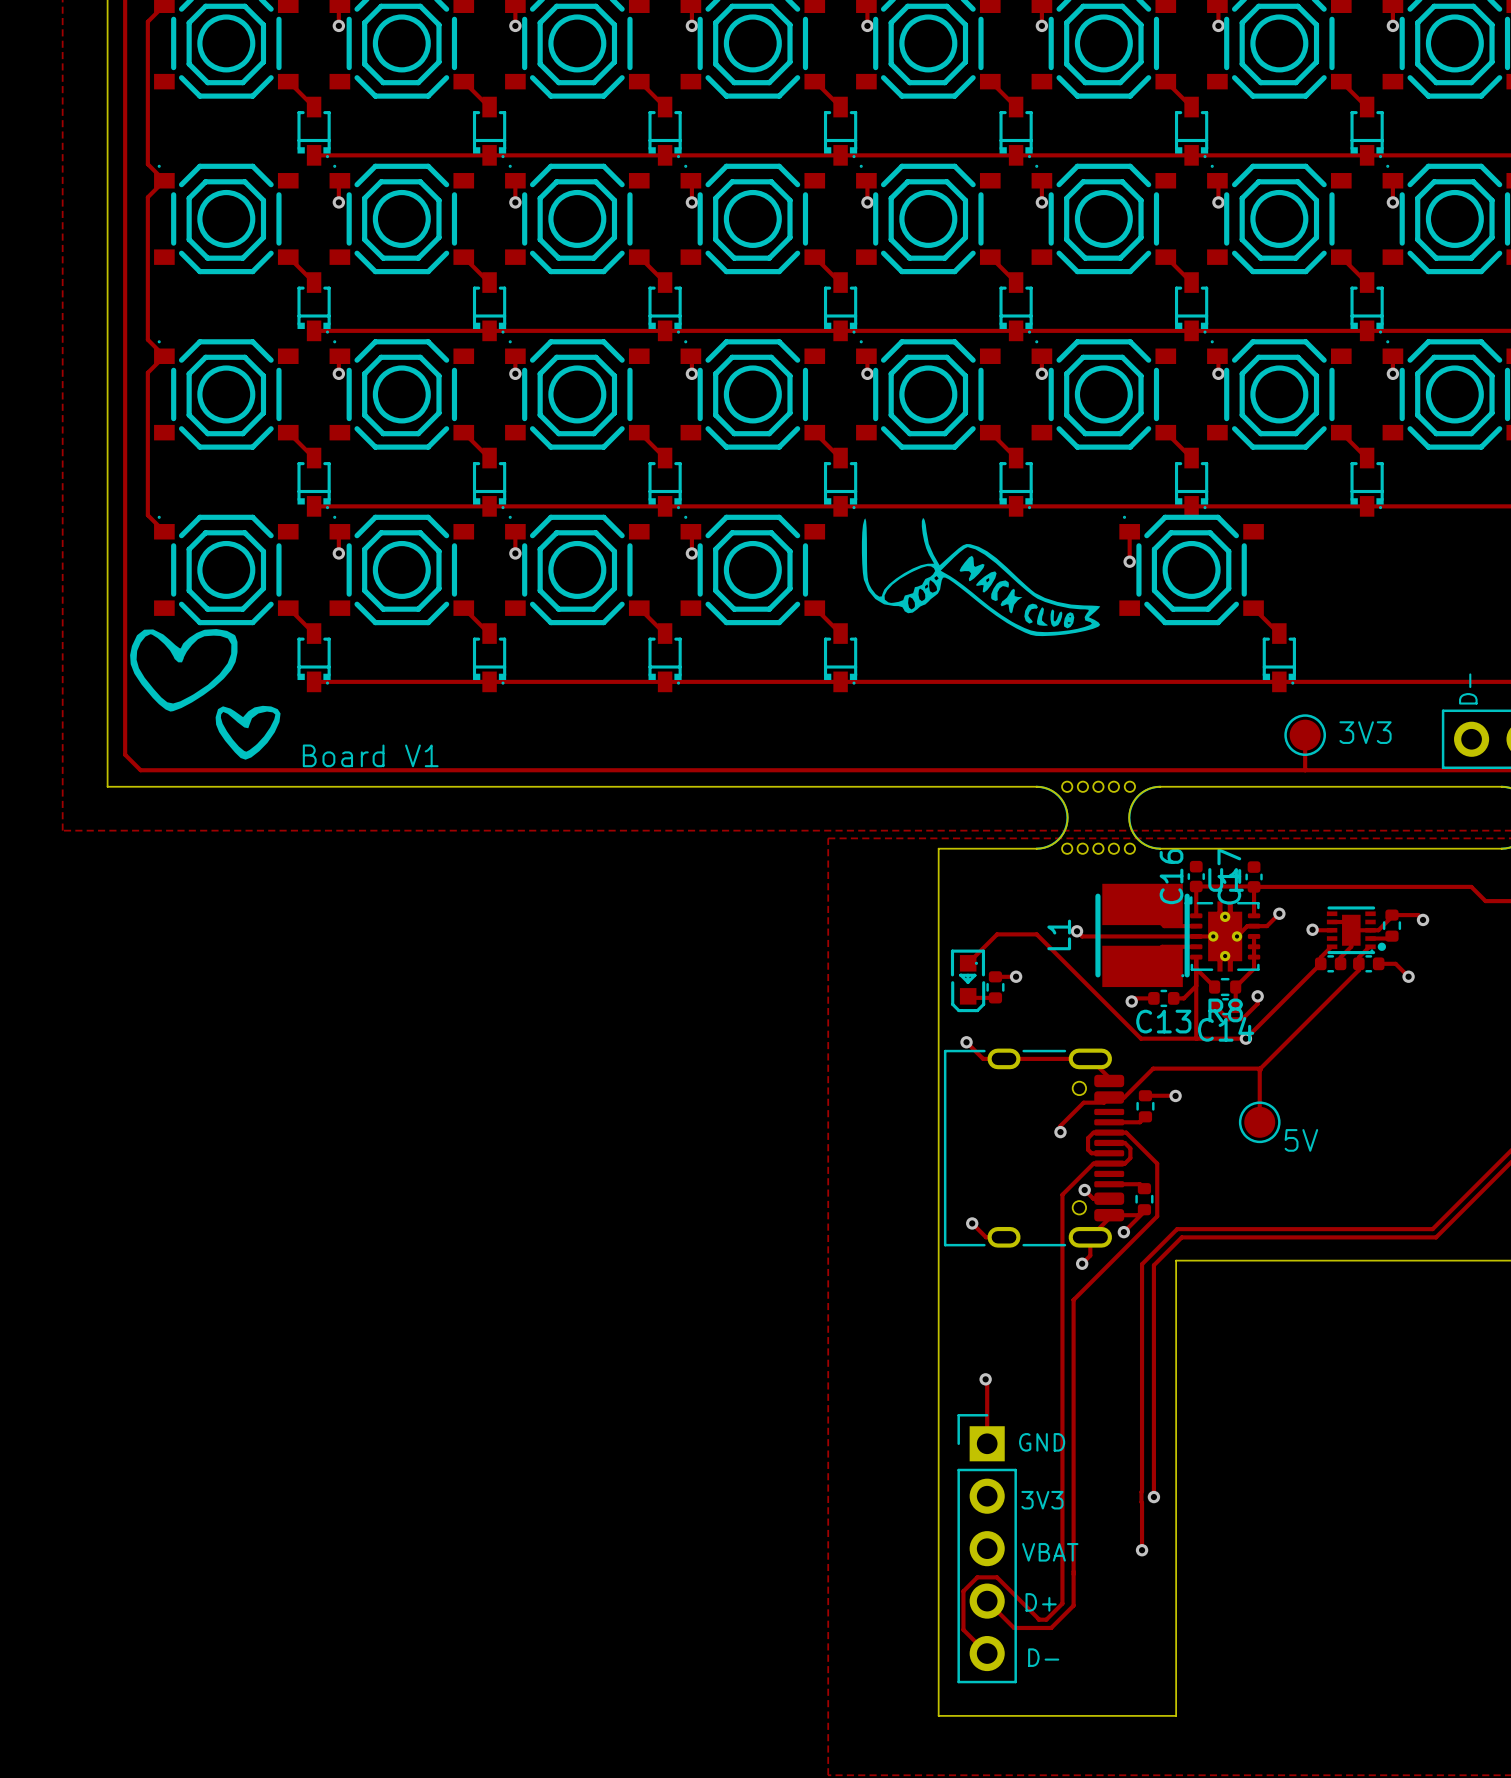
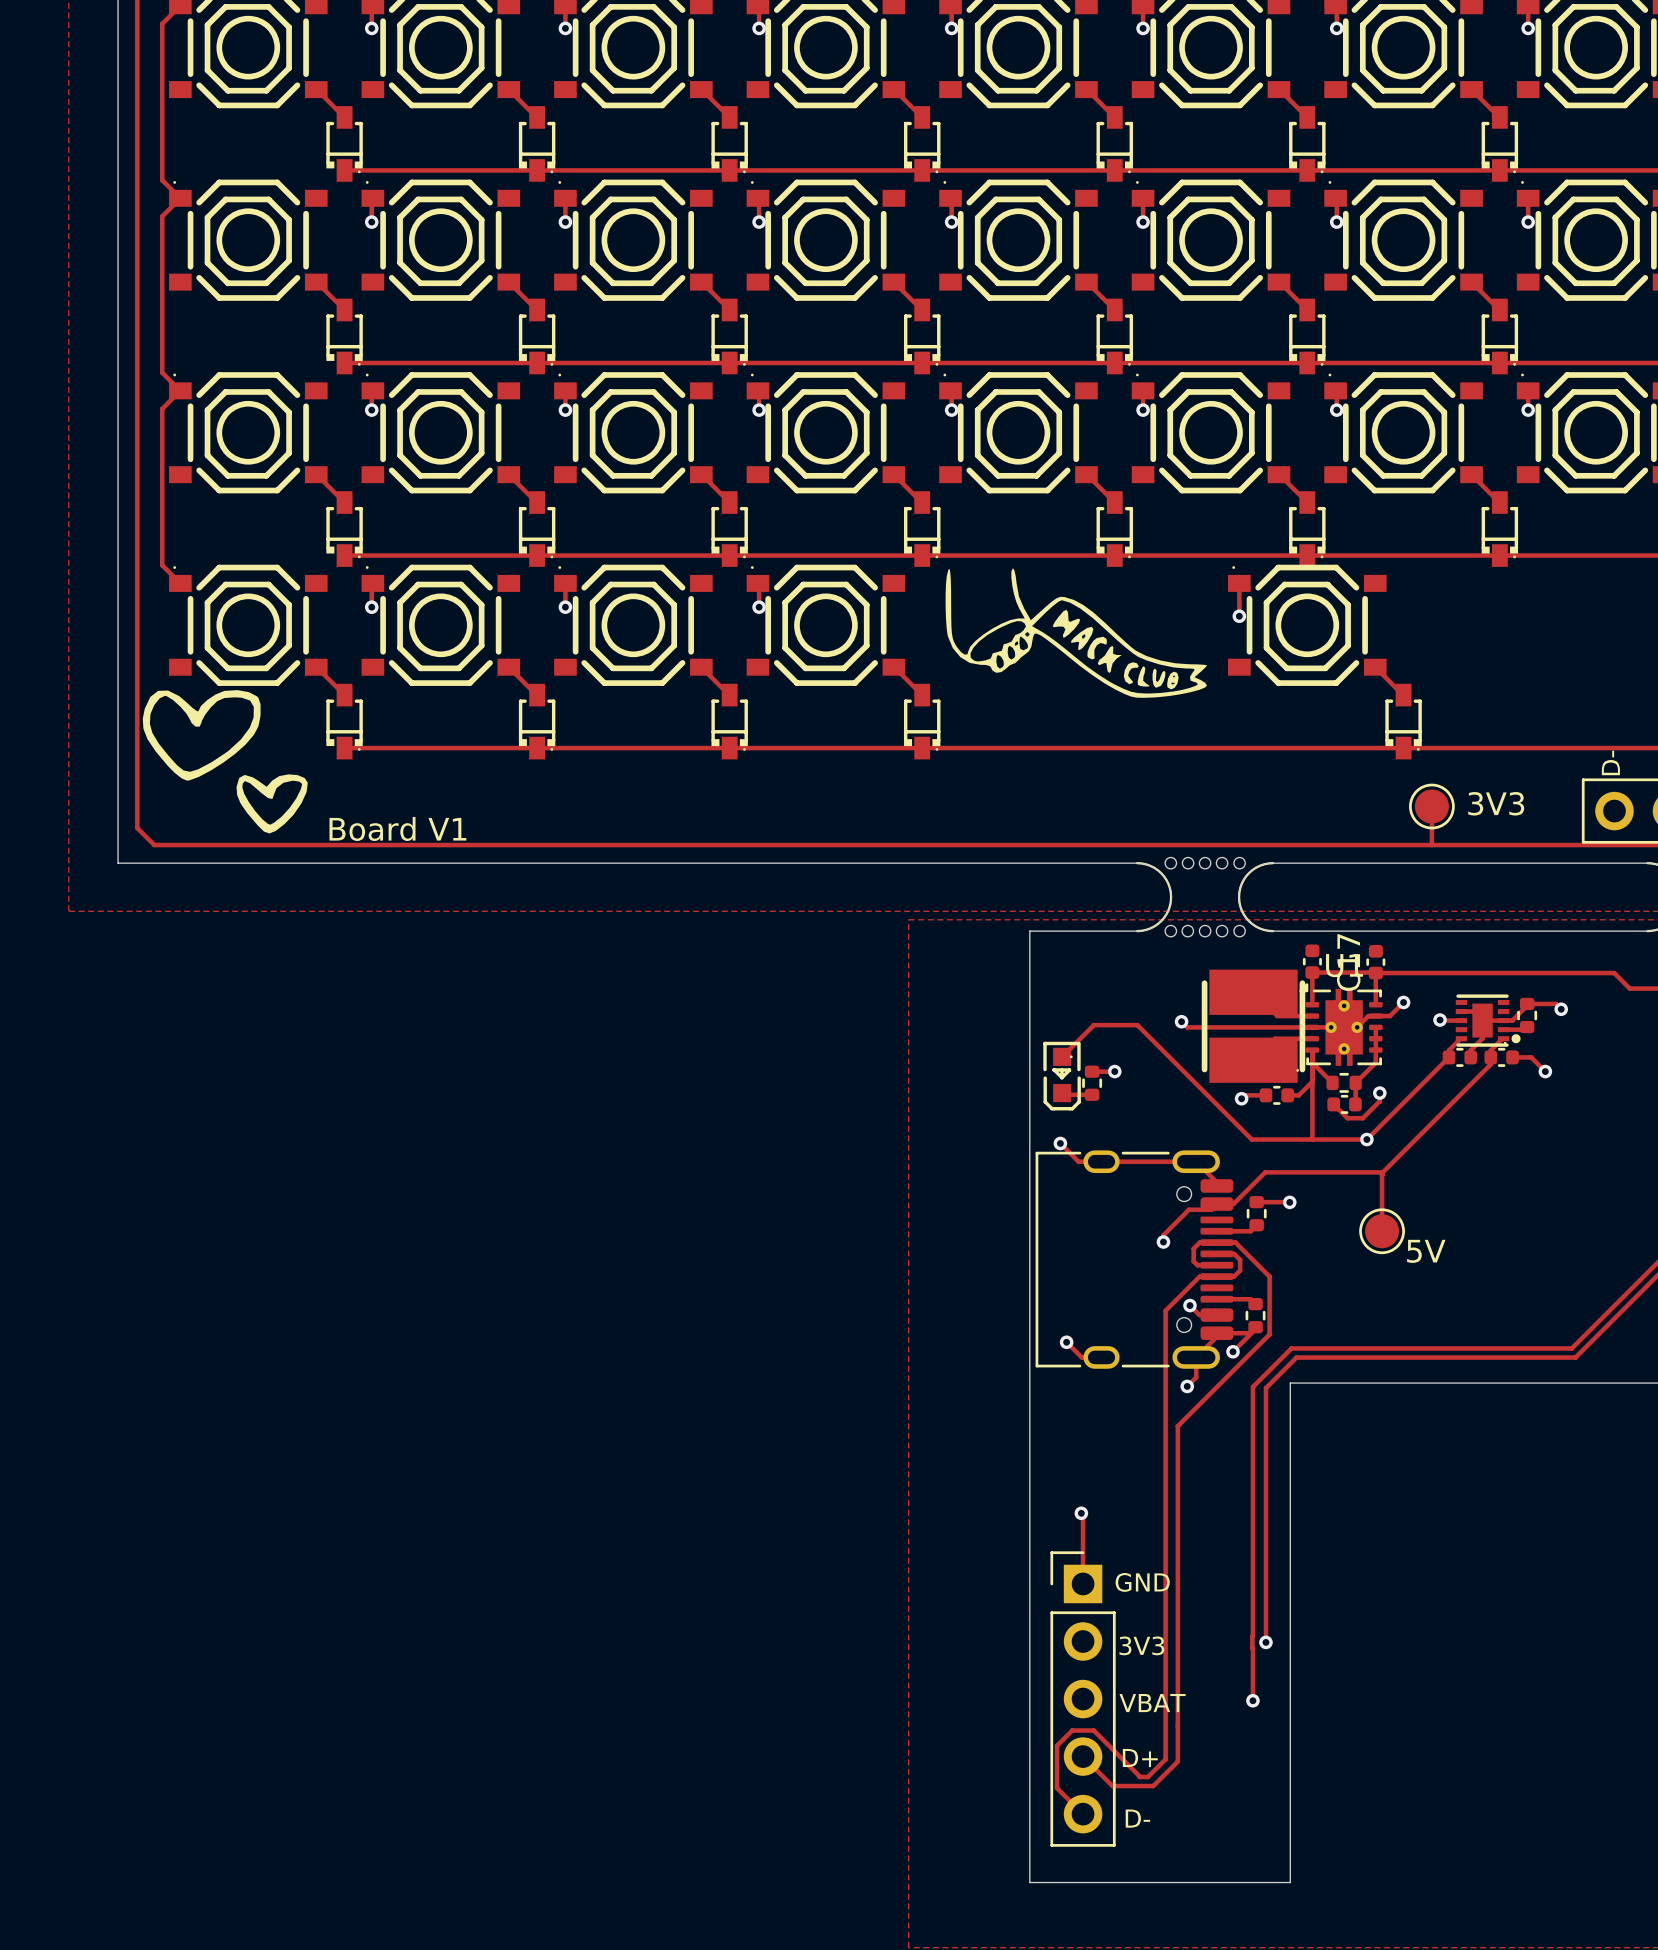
C16 name: C16 (1171, 876) -> none
L1 name: L1 (1059, 934) -> none
R8 name: R8 (1225, 1010) -> none
C13 name: C13 (1163, 1021) -> none
C14 name: C14 (1226, 1029) -> none

